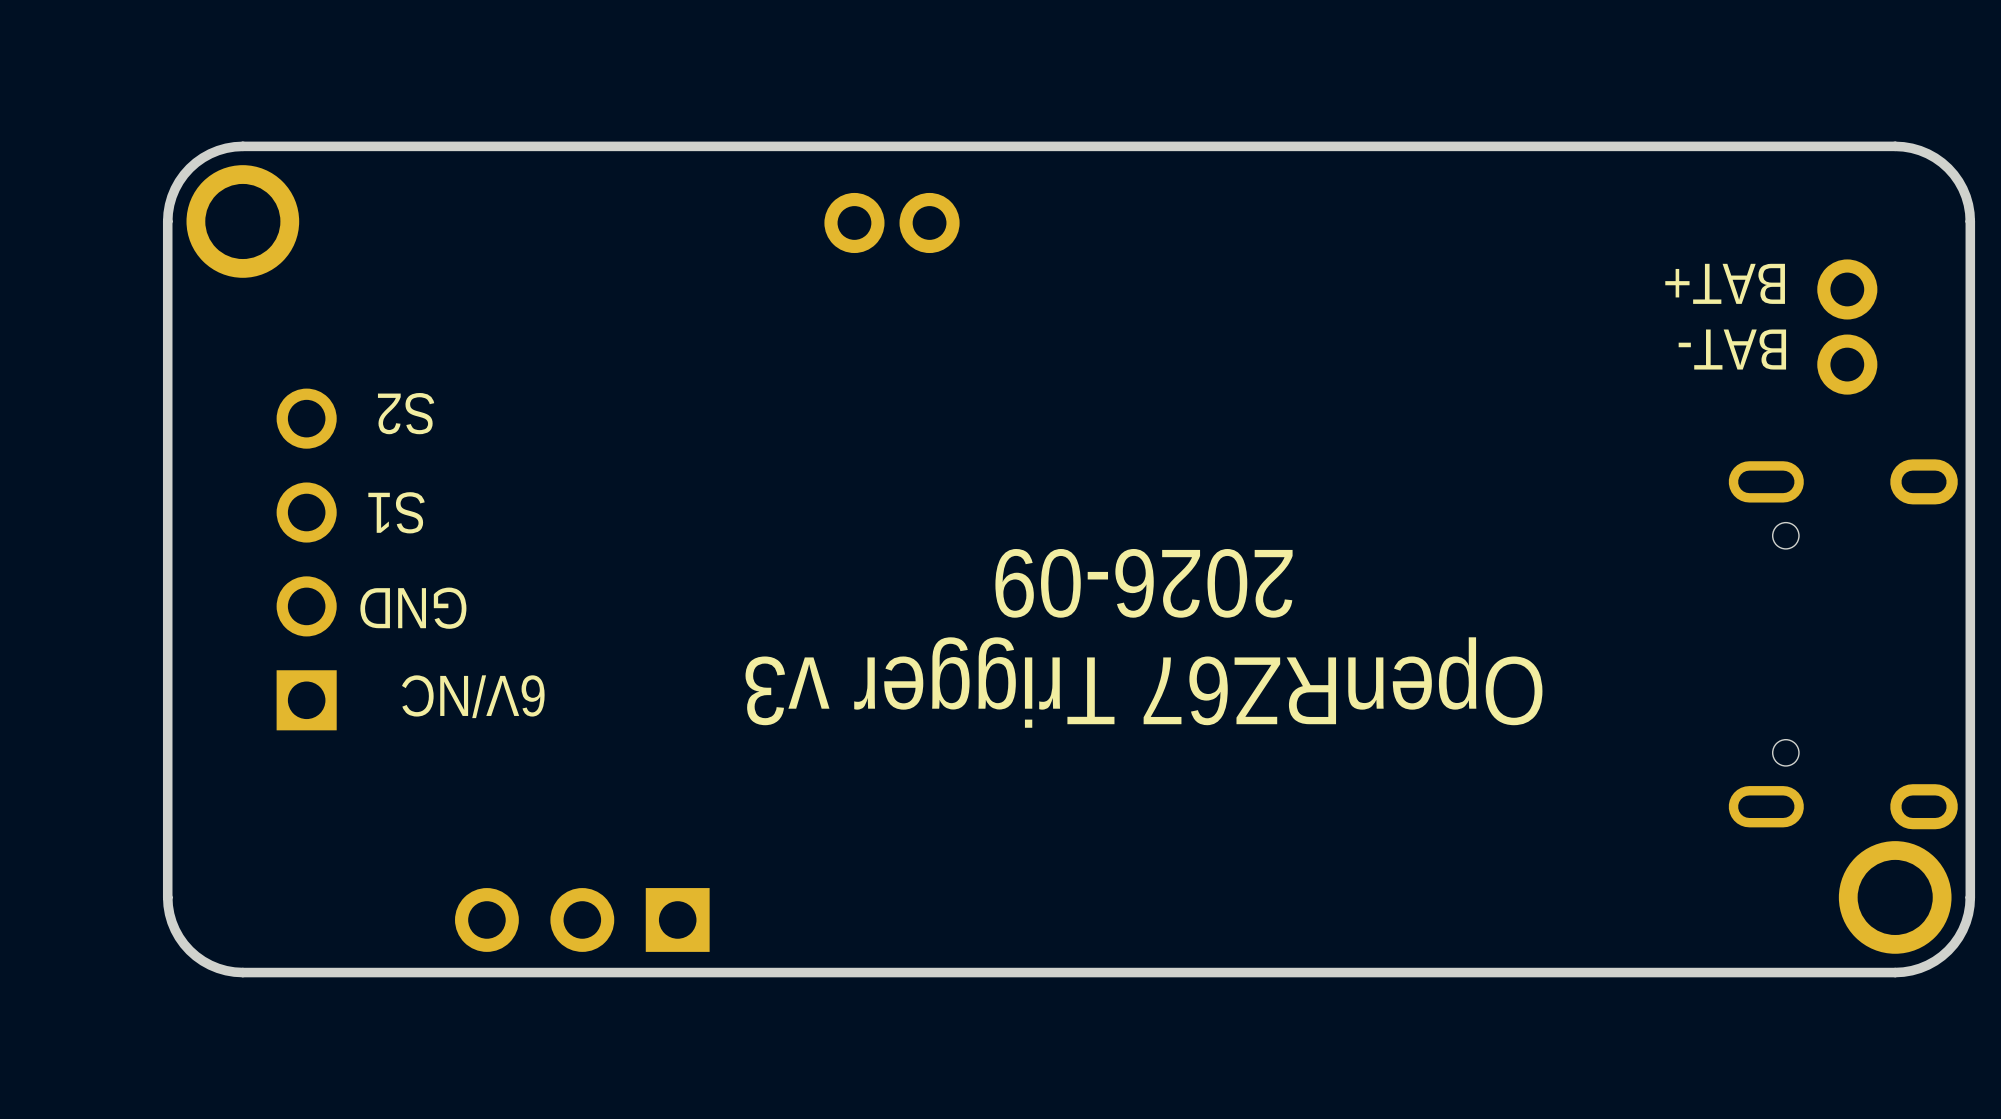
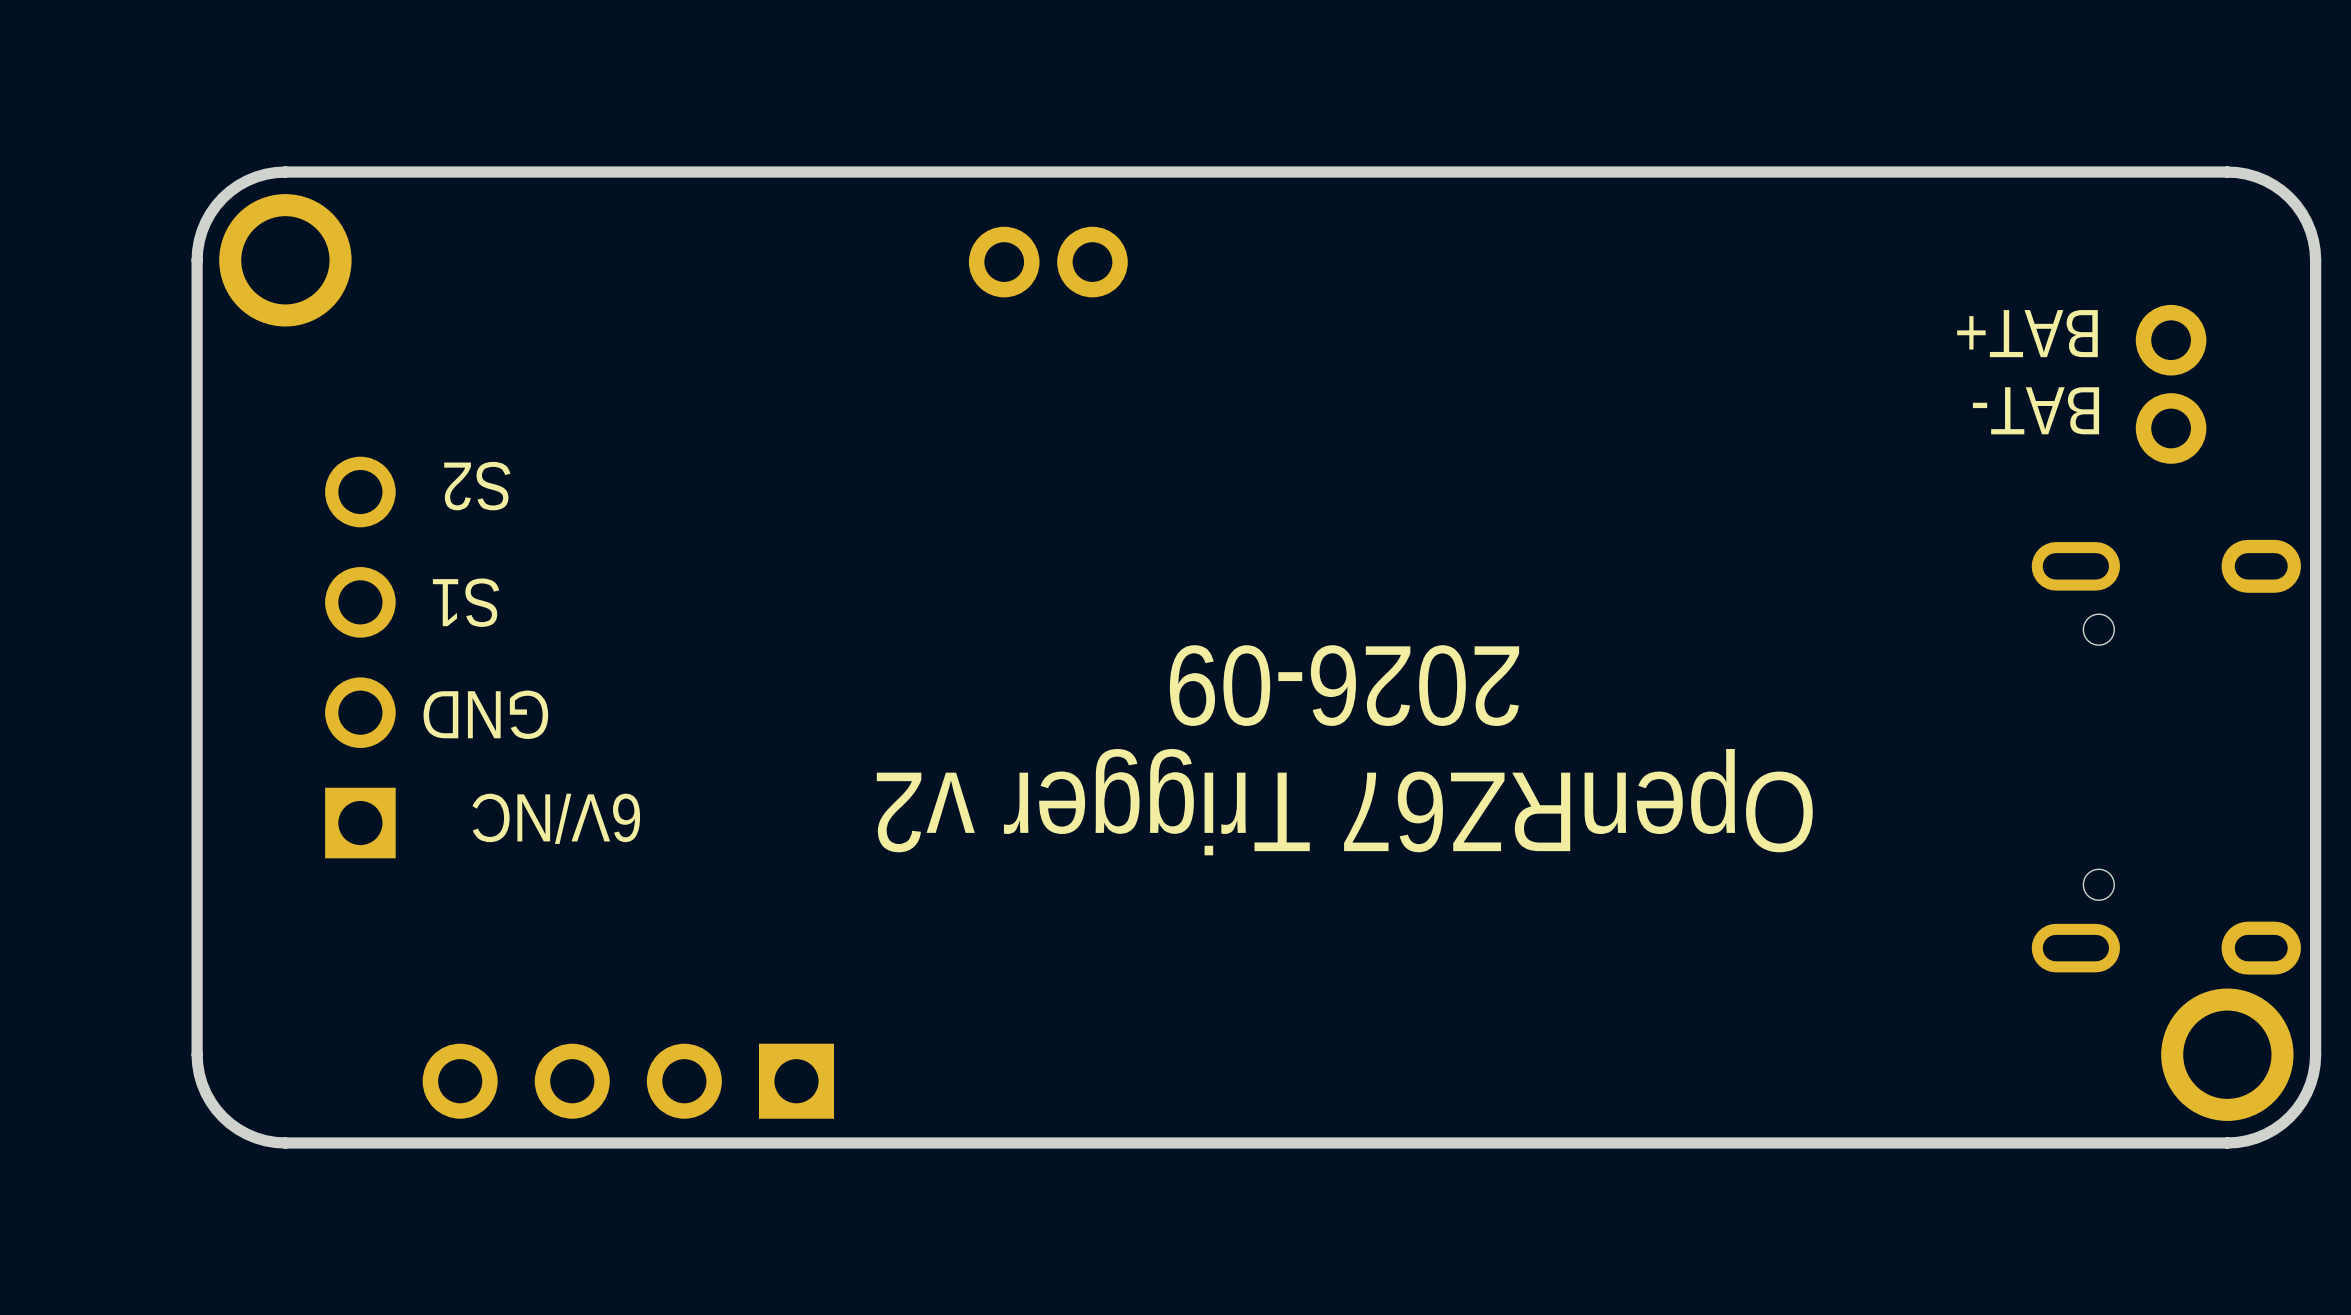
text: OpenRZ67 Trigger v3 (1143, 682) -> OpenRZ67 Trigger v2 (1344, 802)
part: none -> (628, 1081)

